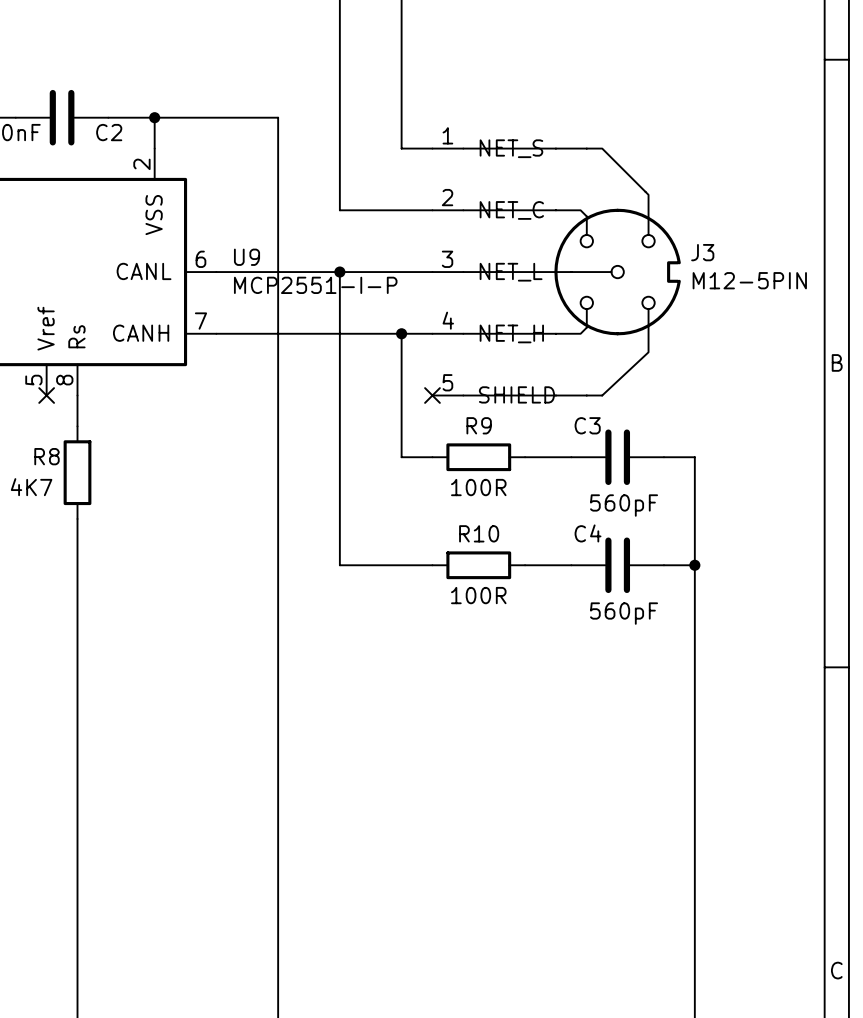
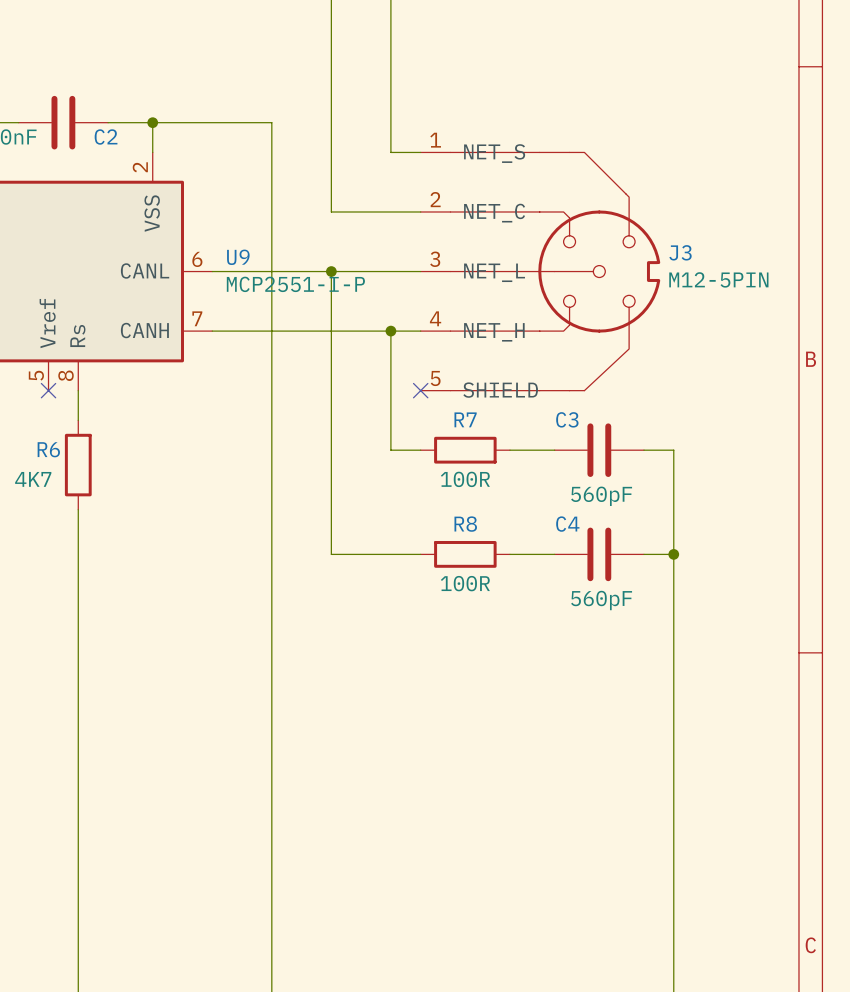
R9 name: R9 (479, 425) -> R7 (465, 419)
R8 name: R8 (47, 456) -> R6 (48, 449)
R10 name: R10 (479, 533) -> R8 (465, 524)

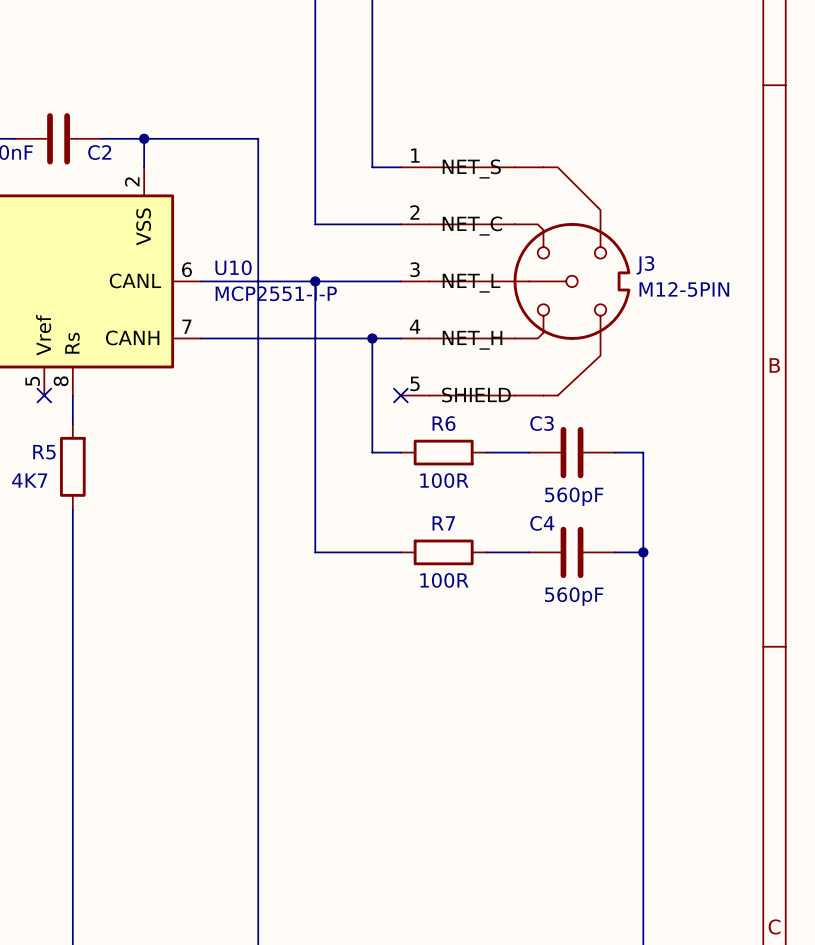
U9 name: U9 (238, 257) -> U10 (233, 267)
R7 name: R7 (465, 419) -> R6 (443, 423)
R6 name: R6 (48, 449) -> R5 (44, 452)
R8 name: R8 (465, 524) -> R7 (443, 523)

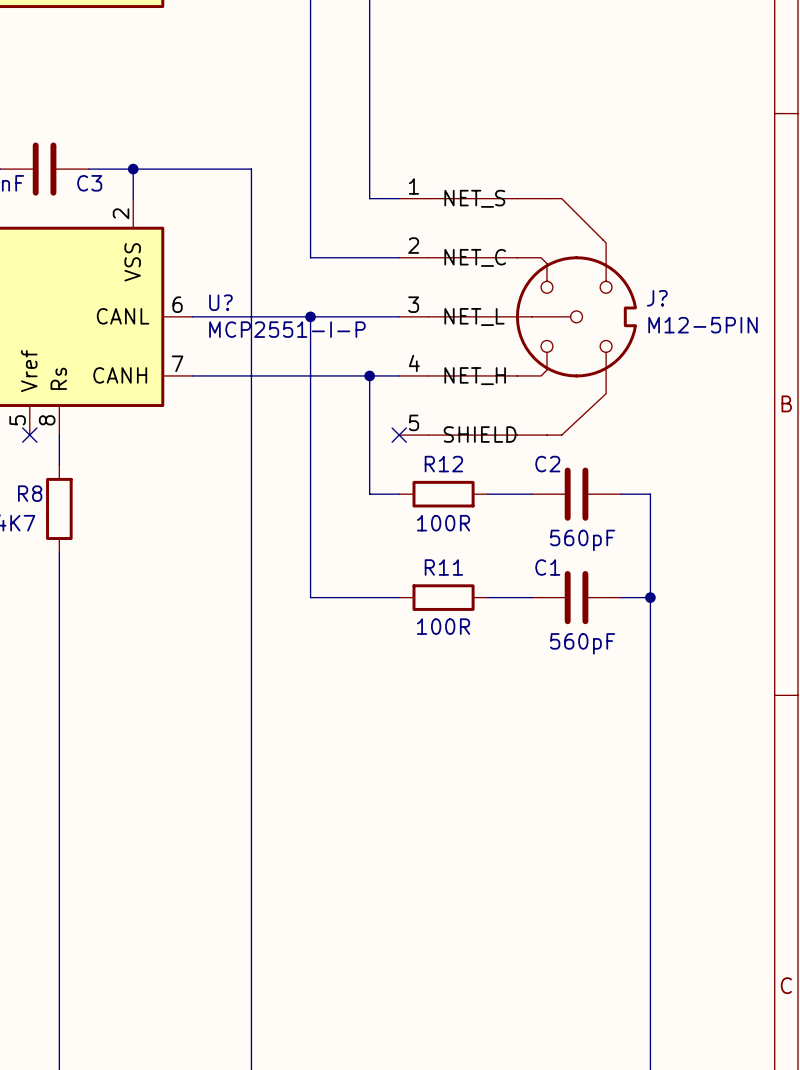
C2 name: C2 (99, 152) -> C3 (89, 183)
J3 name: J3 (645, 265) -> J? (657, 298)
U10 name: U10 (233, 267) -> U? (220, 302)
R6 name: R6 (443, 423) -> R12 (443, 464)
C3 name: C3 (542, 423) -> C2 (547, 464)
R5 name: R5 (44, 452) -> R8 (30, 493)
R7 name: R7 (443, 523) -> R11 (443, 567)
C4 name: C4 (542, 523) -> C1 (547, 567)

